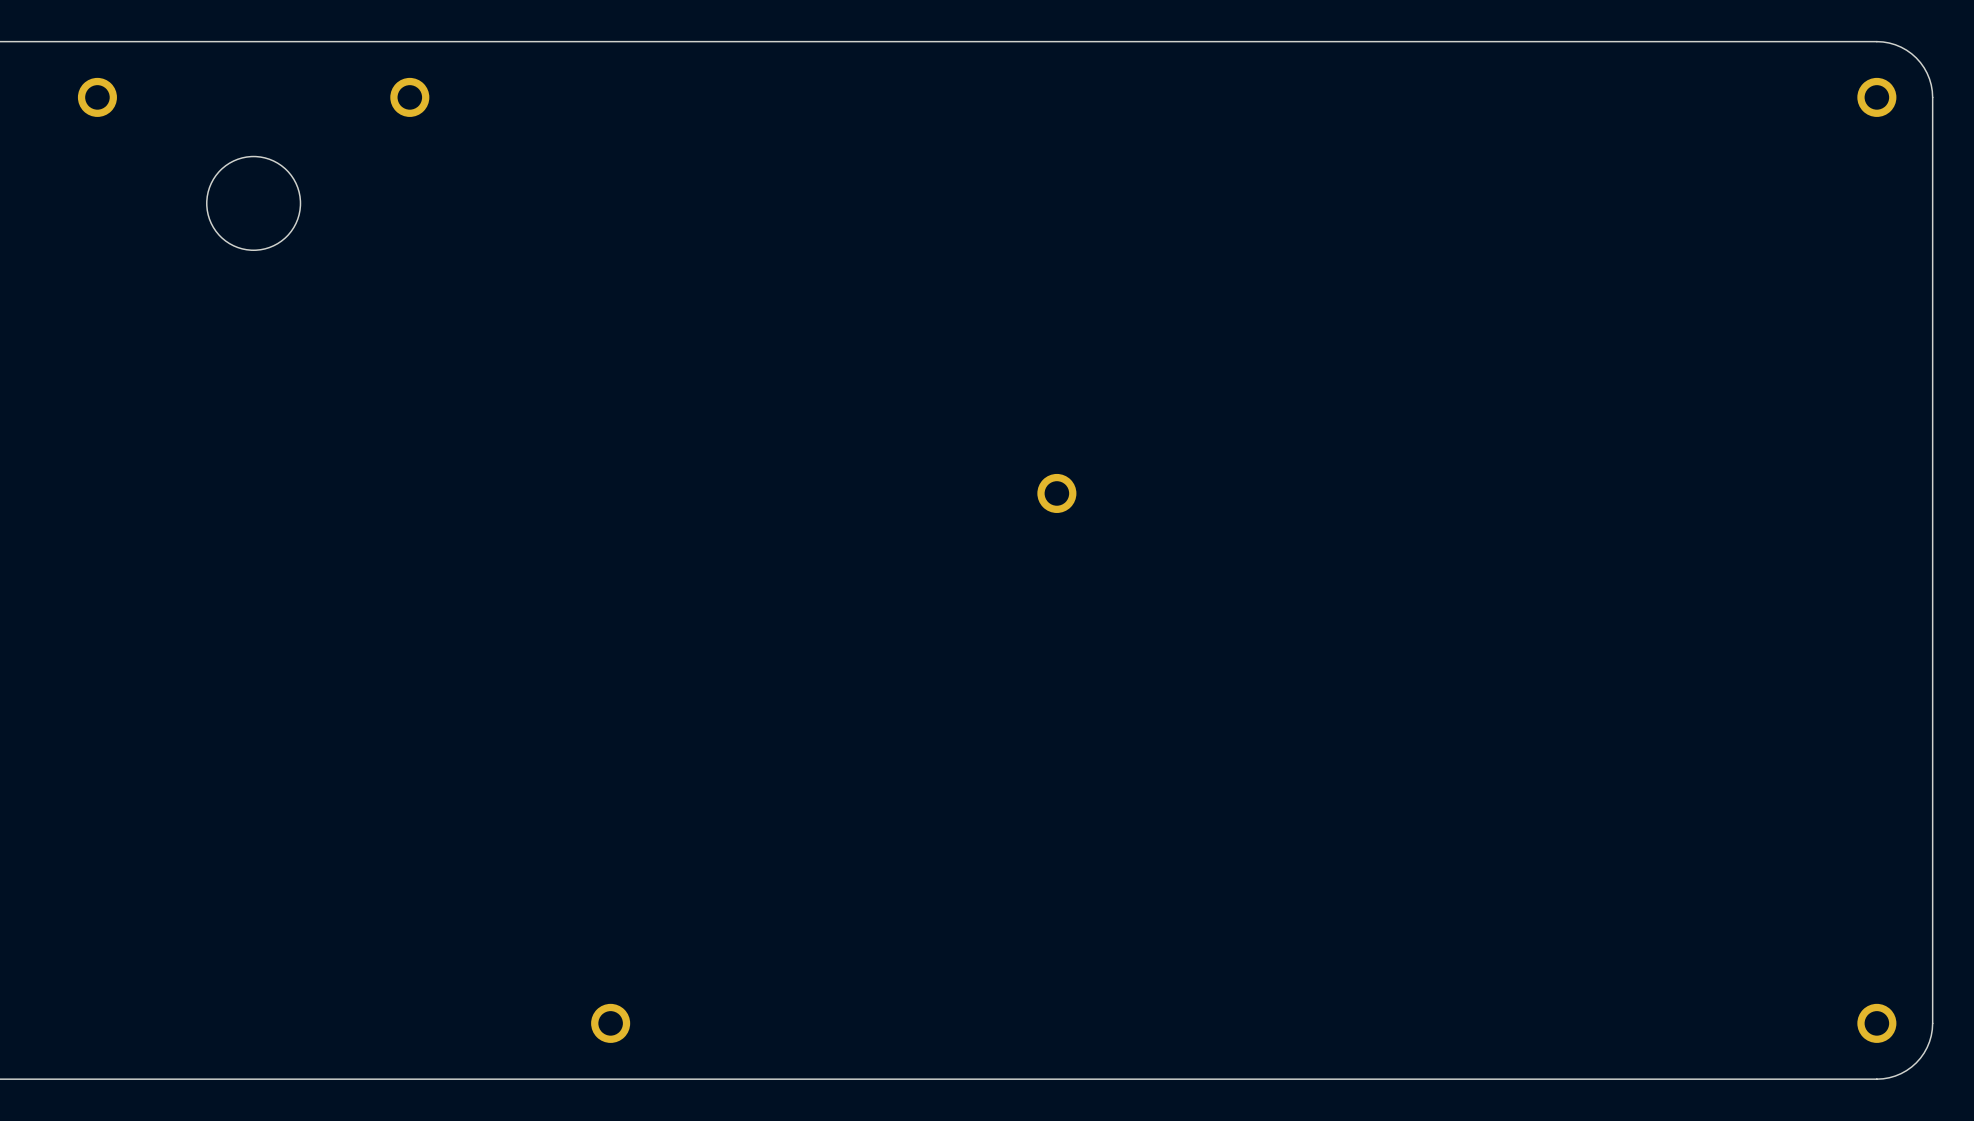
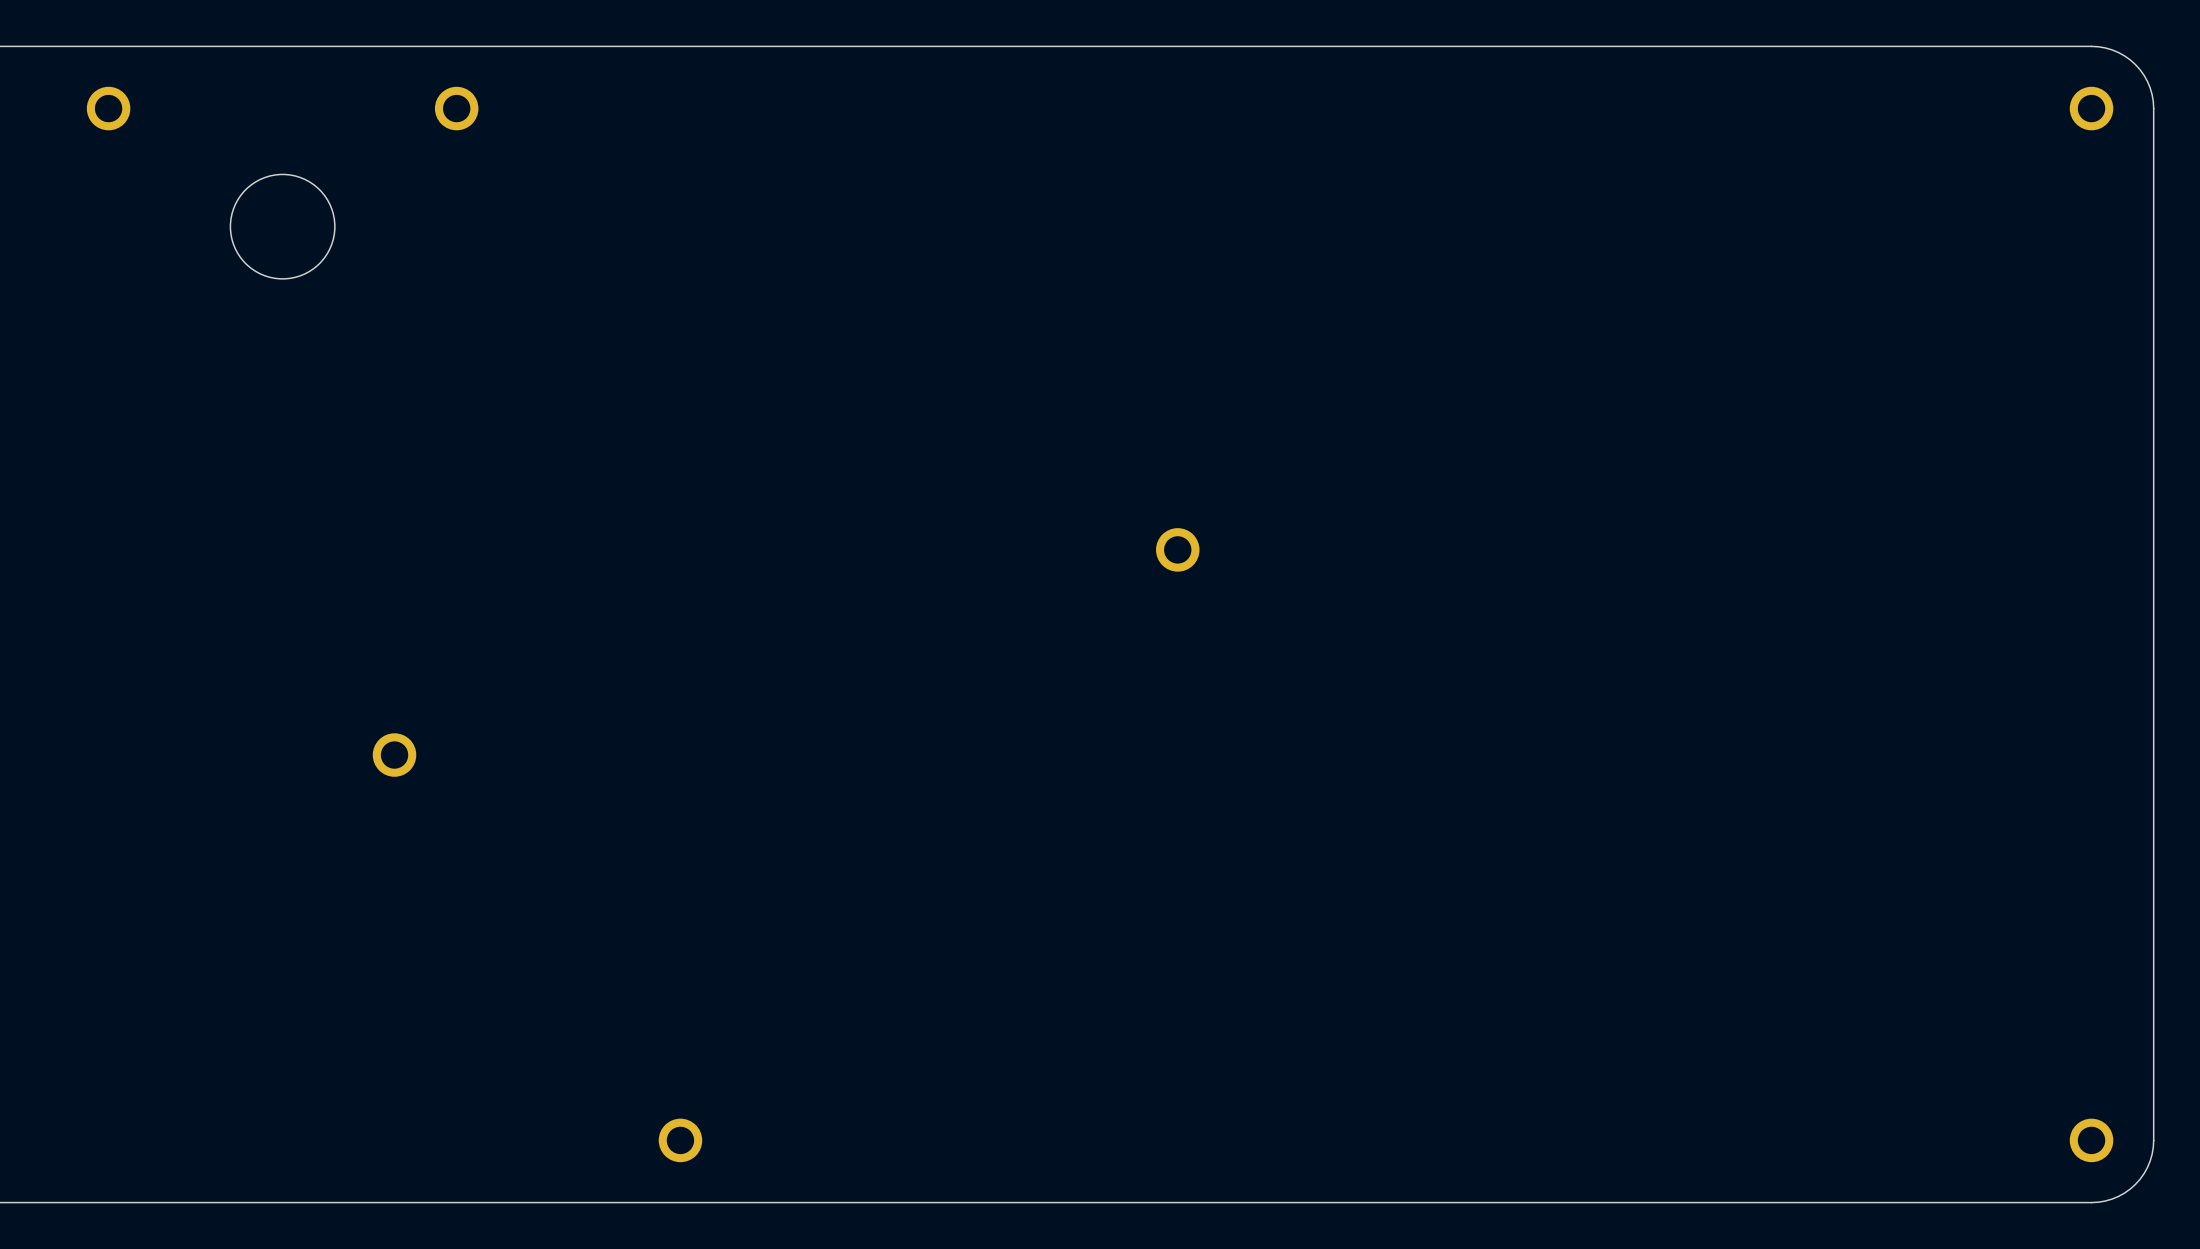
part: none -> (394, 755)

